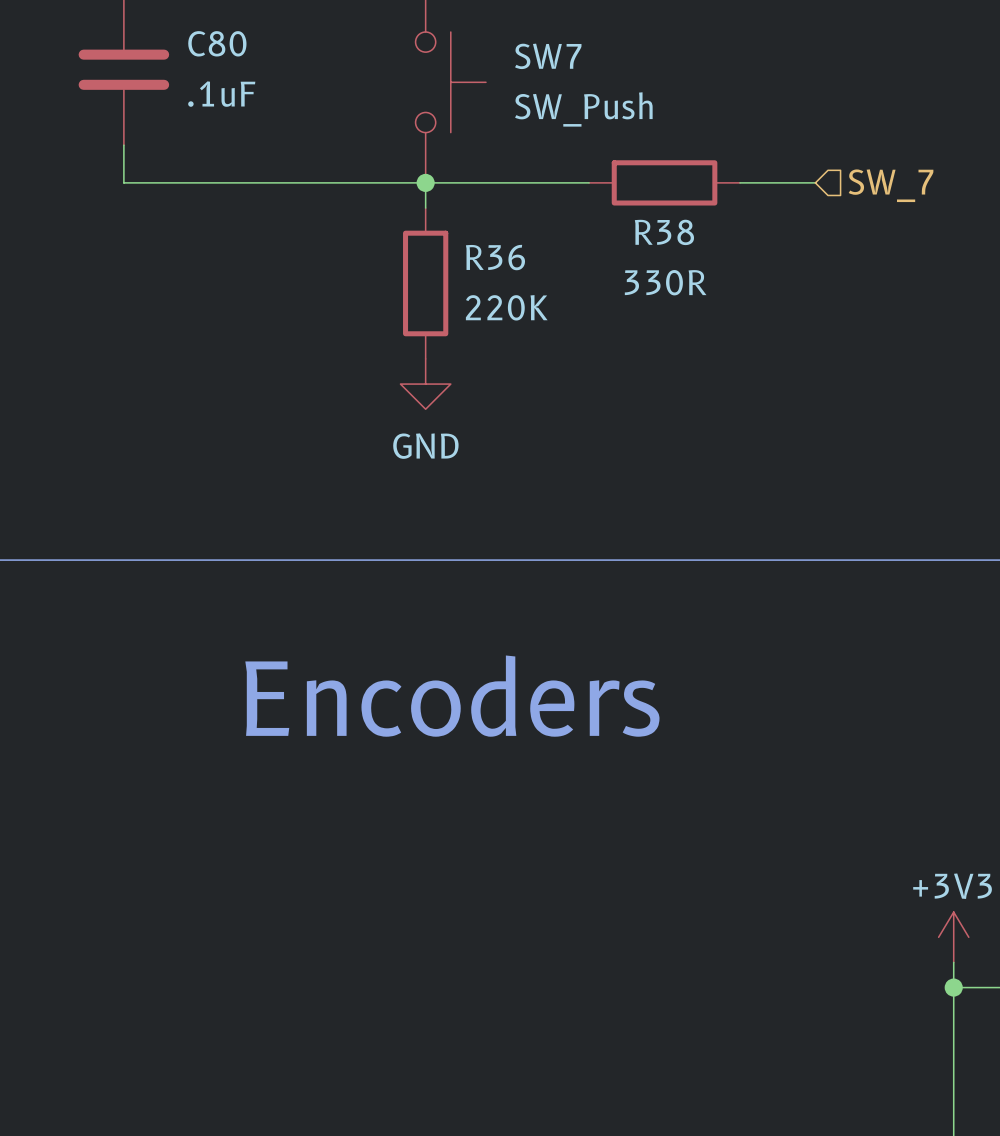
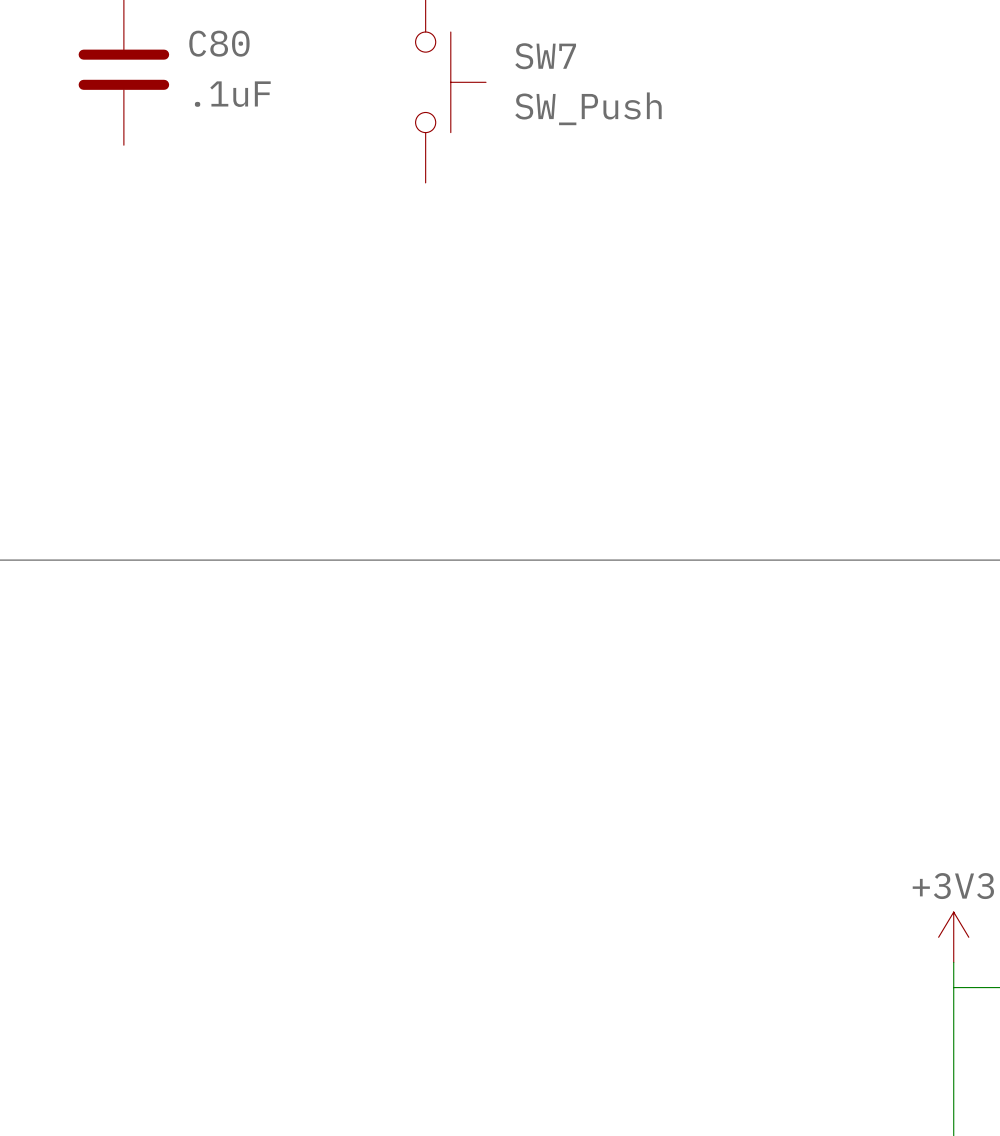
wire: (123, 145) (123, 182) (589, 182) -> none
wire: (425, 182) (425, 208) -> none
junction: (425, 182) -> none
R38: 330R (664, 182) -> none
wire: (739, 182) (815, 182) -> none
hierarchical label: SW_7 (891, 185) -> none
R36: 220K (425, 283) -> none
power symbol: GND (425, 384) -> none
text: Encoders (452, 696) -> none
junction: (953, 987) -> none

